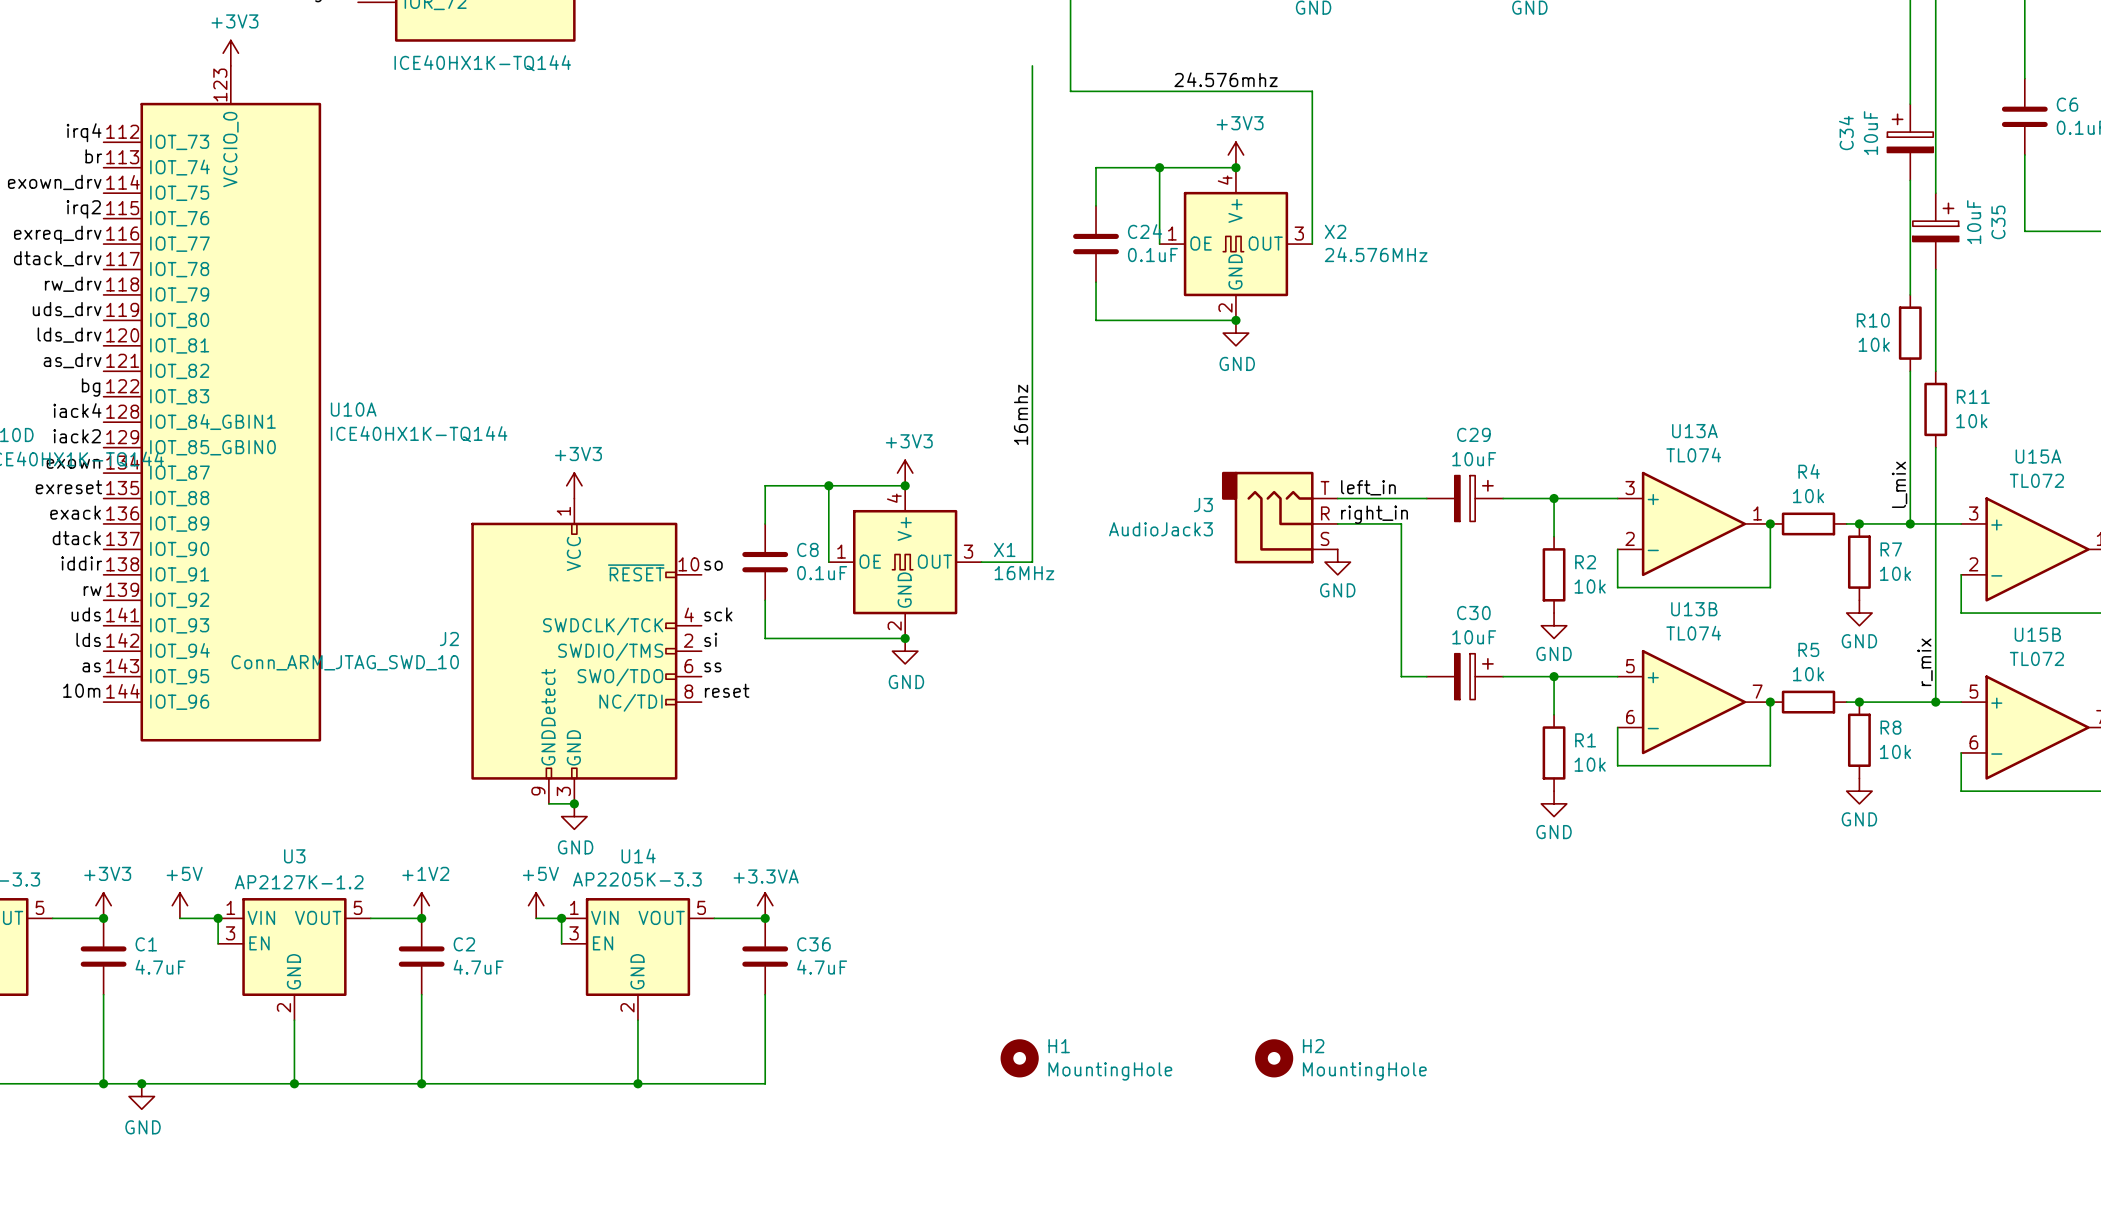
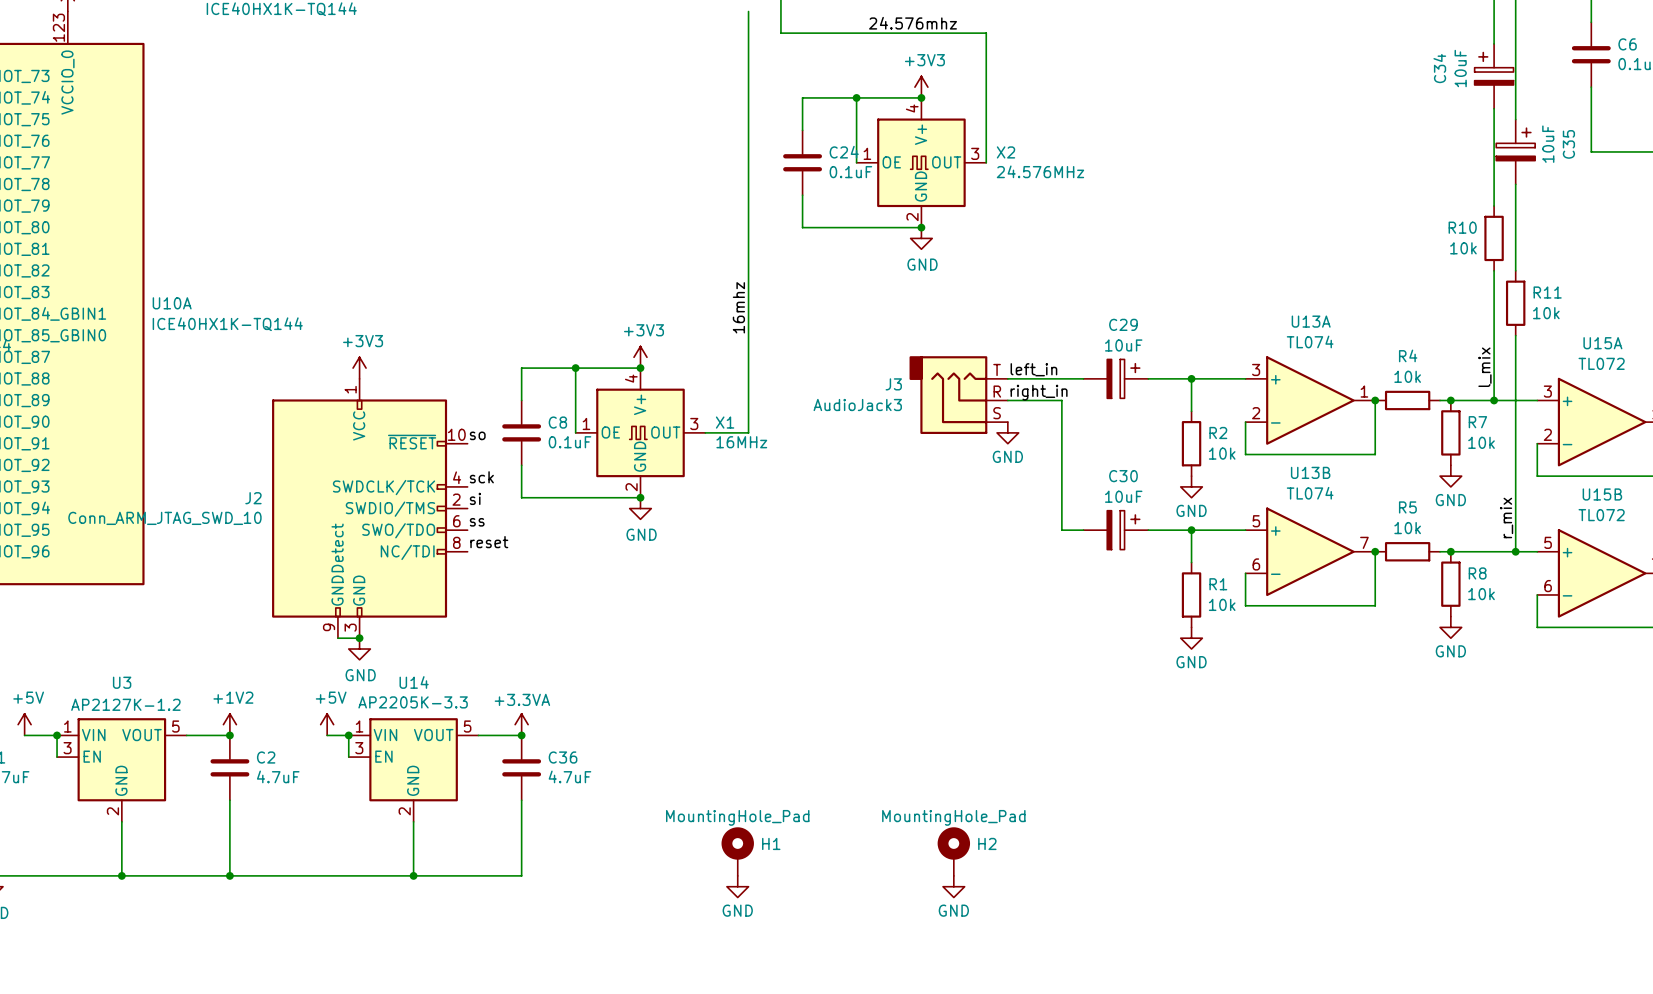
H1 symbol: [1000, 1039, 1039, 1078] -> [721, 827, 754, 876]
H2 symbol: [1255, 1039, 1294, 1078] -> [937, 827, 971, 876]
H1 value: MountingHole (1110, 1071) -> MountingHole_Pad (737, 817)
H2 value: MountingHole (1364, 1071) -> MountingHole_Pad (953, 817)
power symbol: none -> GND (737, 886)
power symbol: none -> GND (953, 886)

